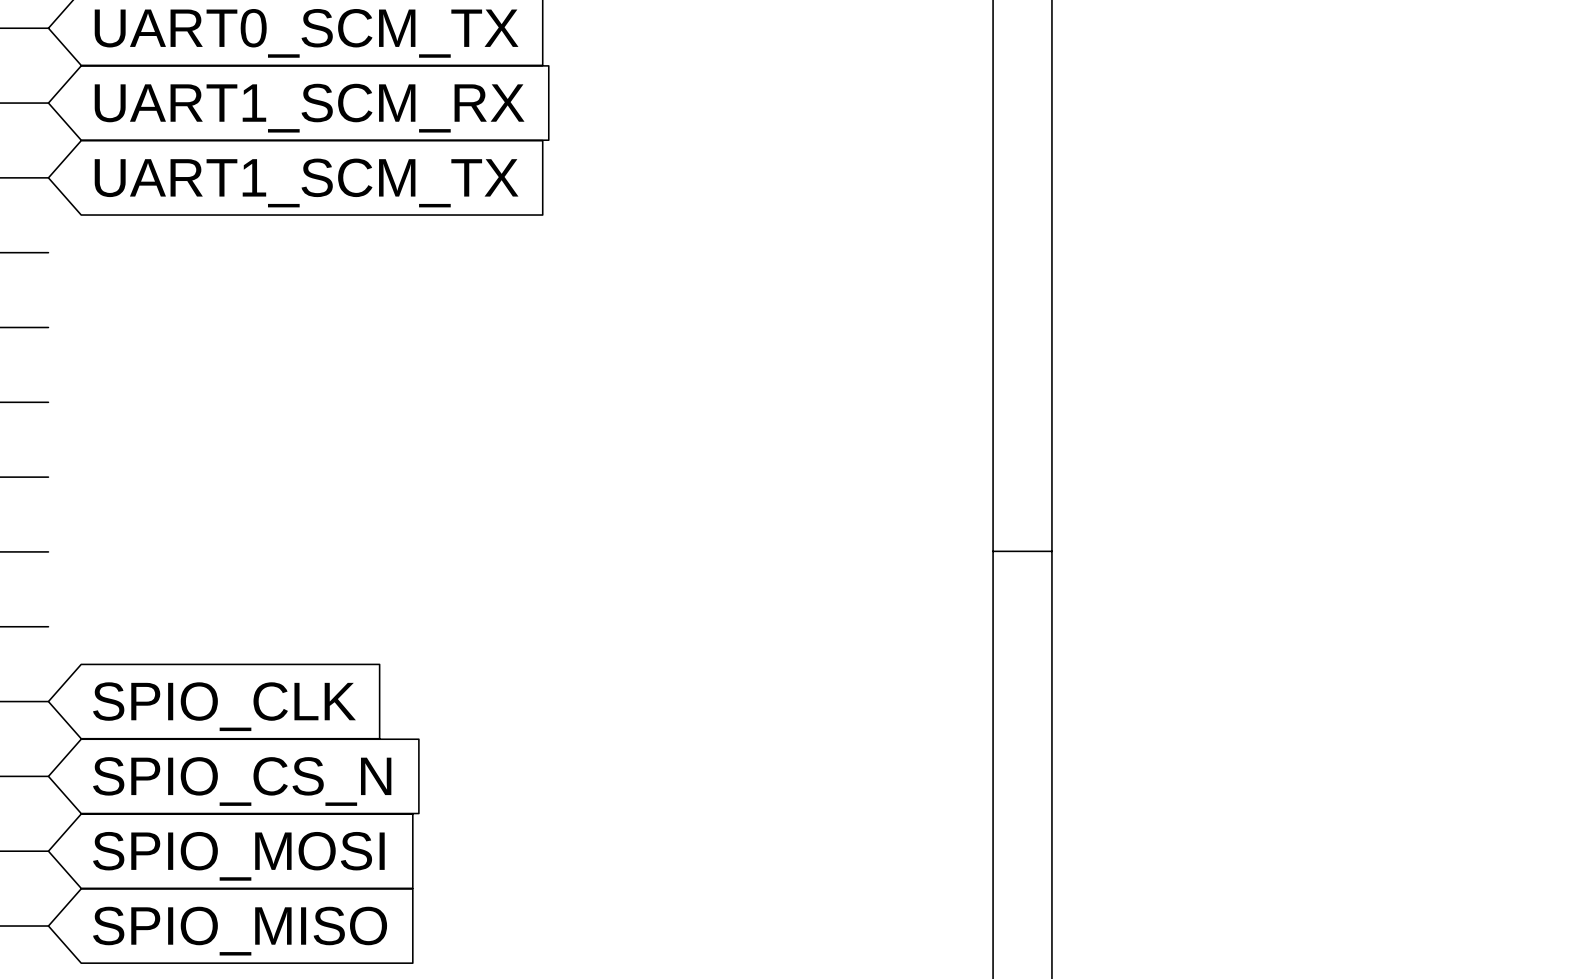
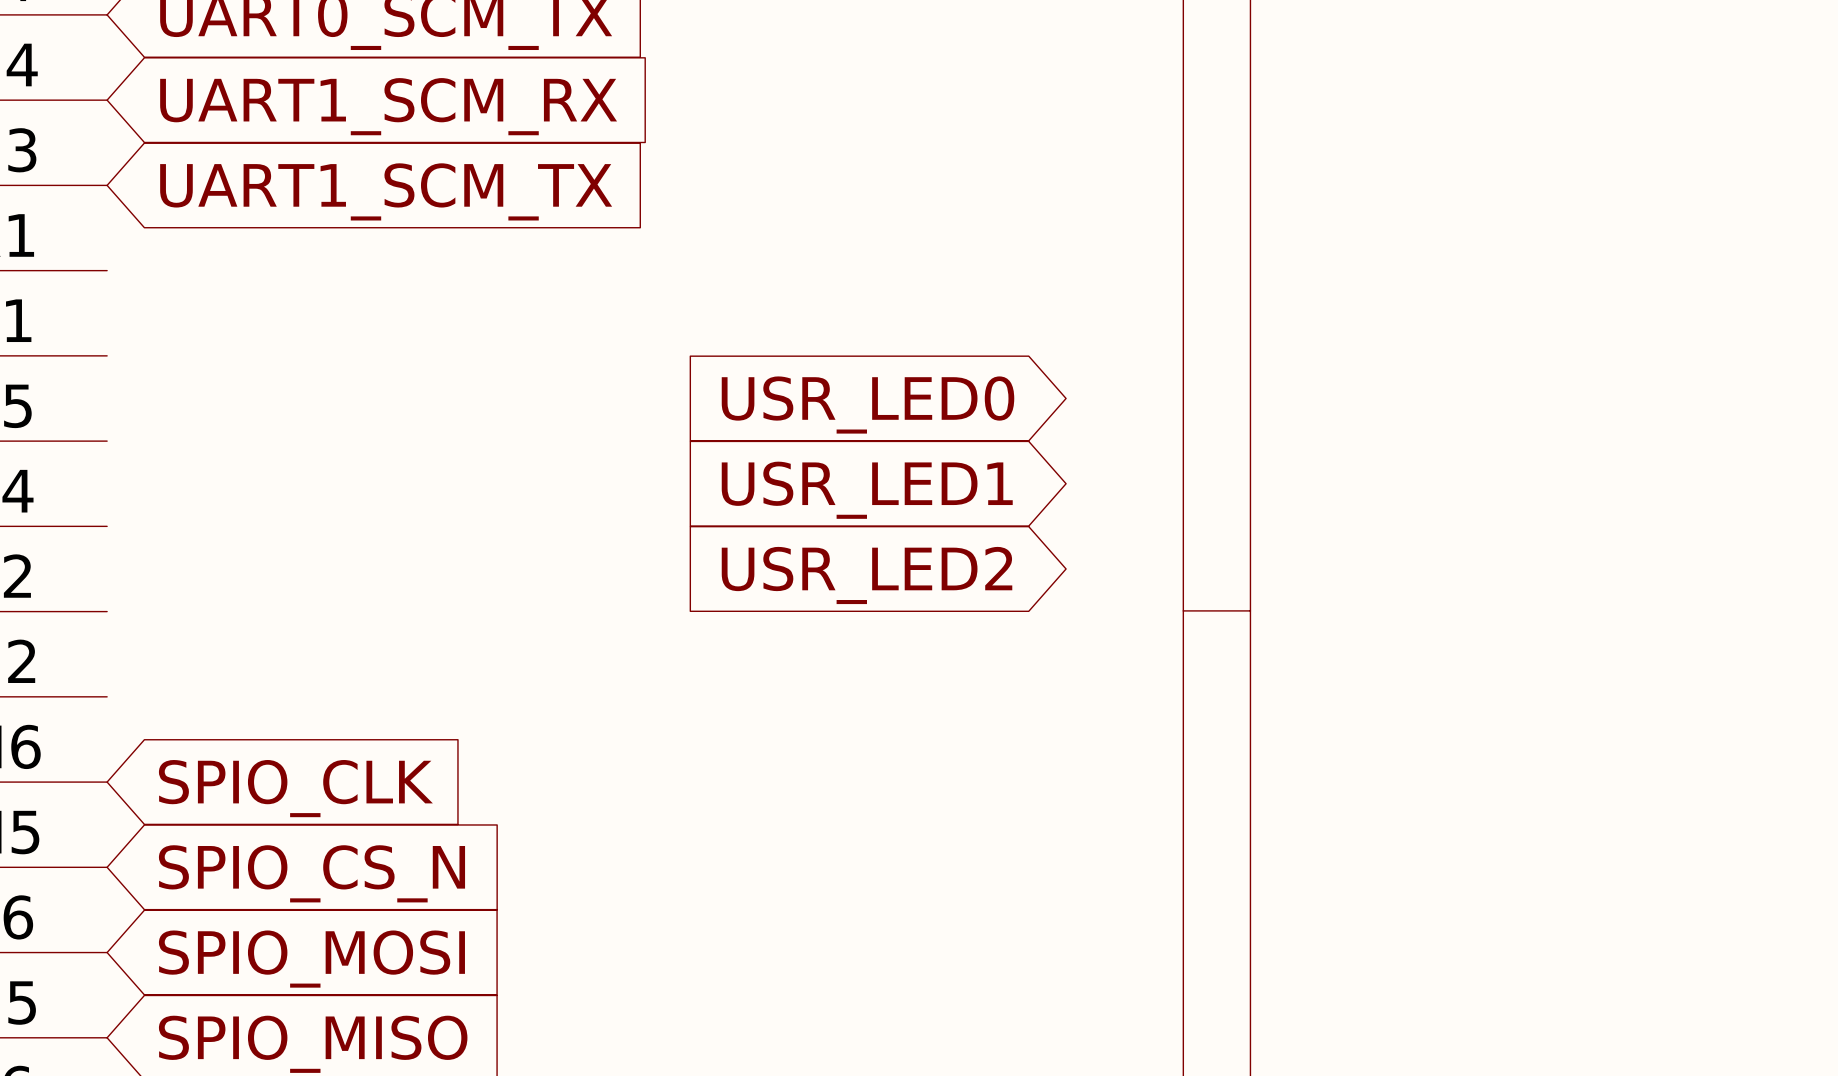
global label: none -> USR_LED0 (867, 405)
global label: none -> USR_LED1 (867, 490)
global label: none -> USR_LED2 (867, 575)

